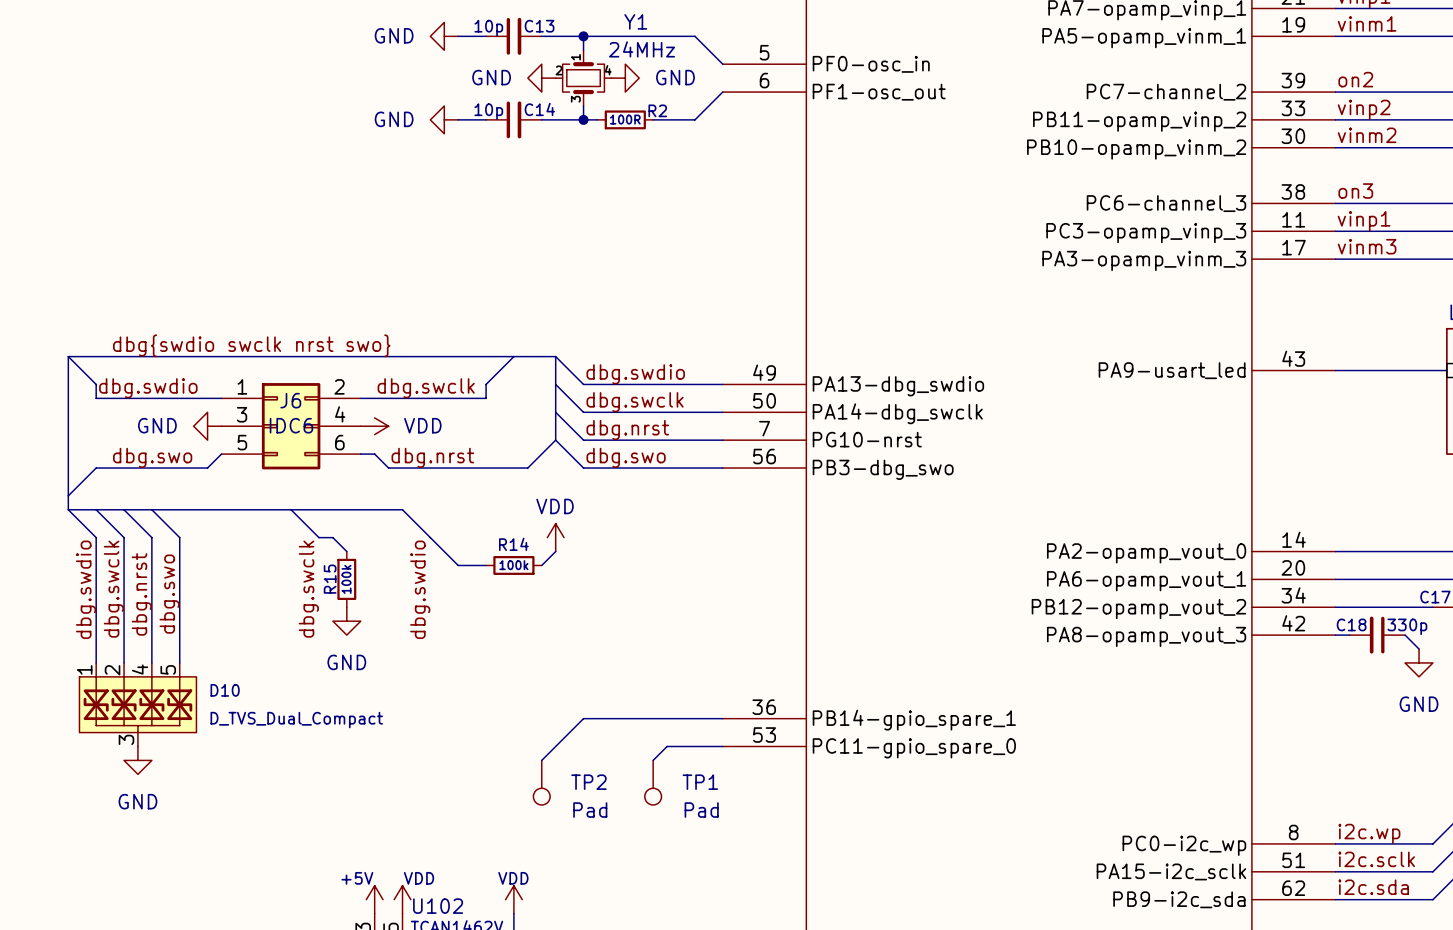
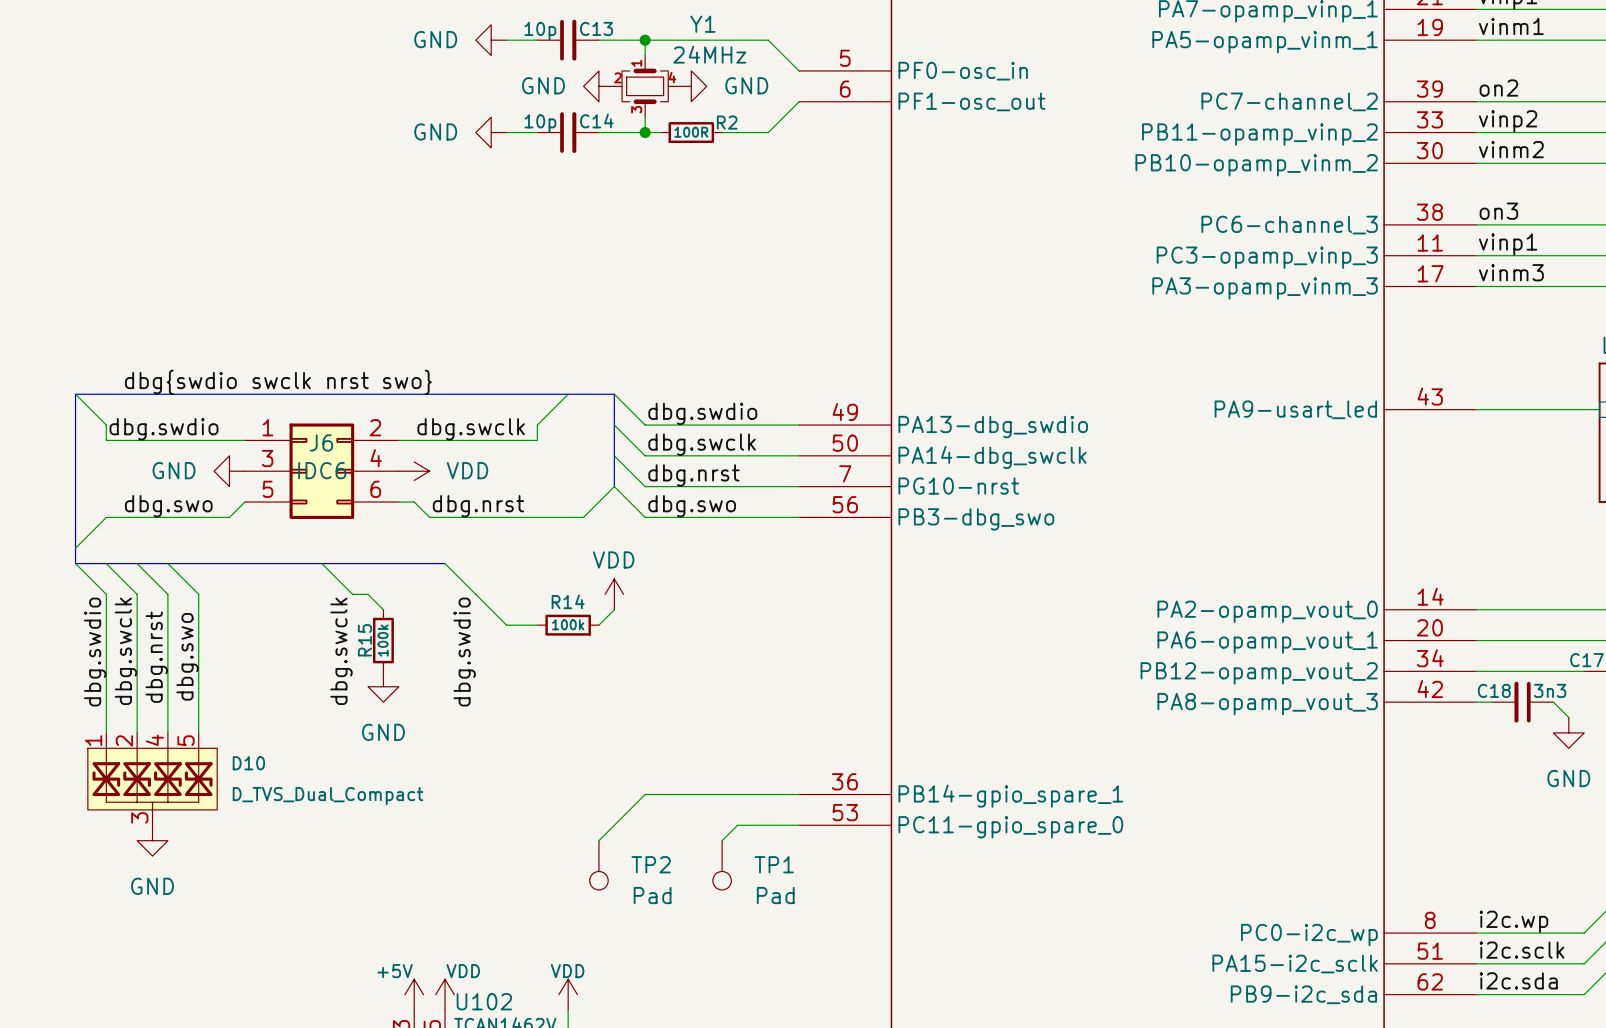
C18 value: 330p (1407, 626) -> 3n3 (1550, 690)

